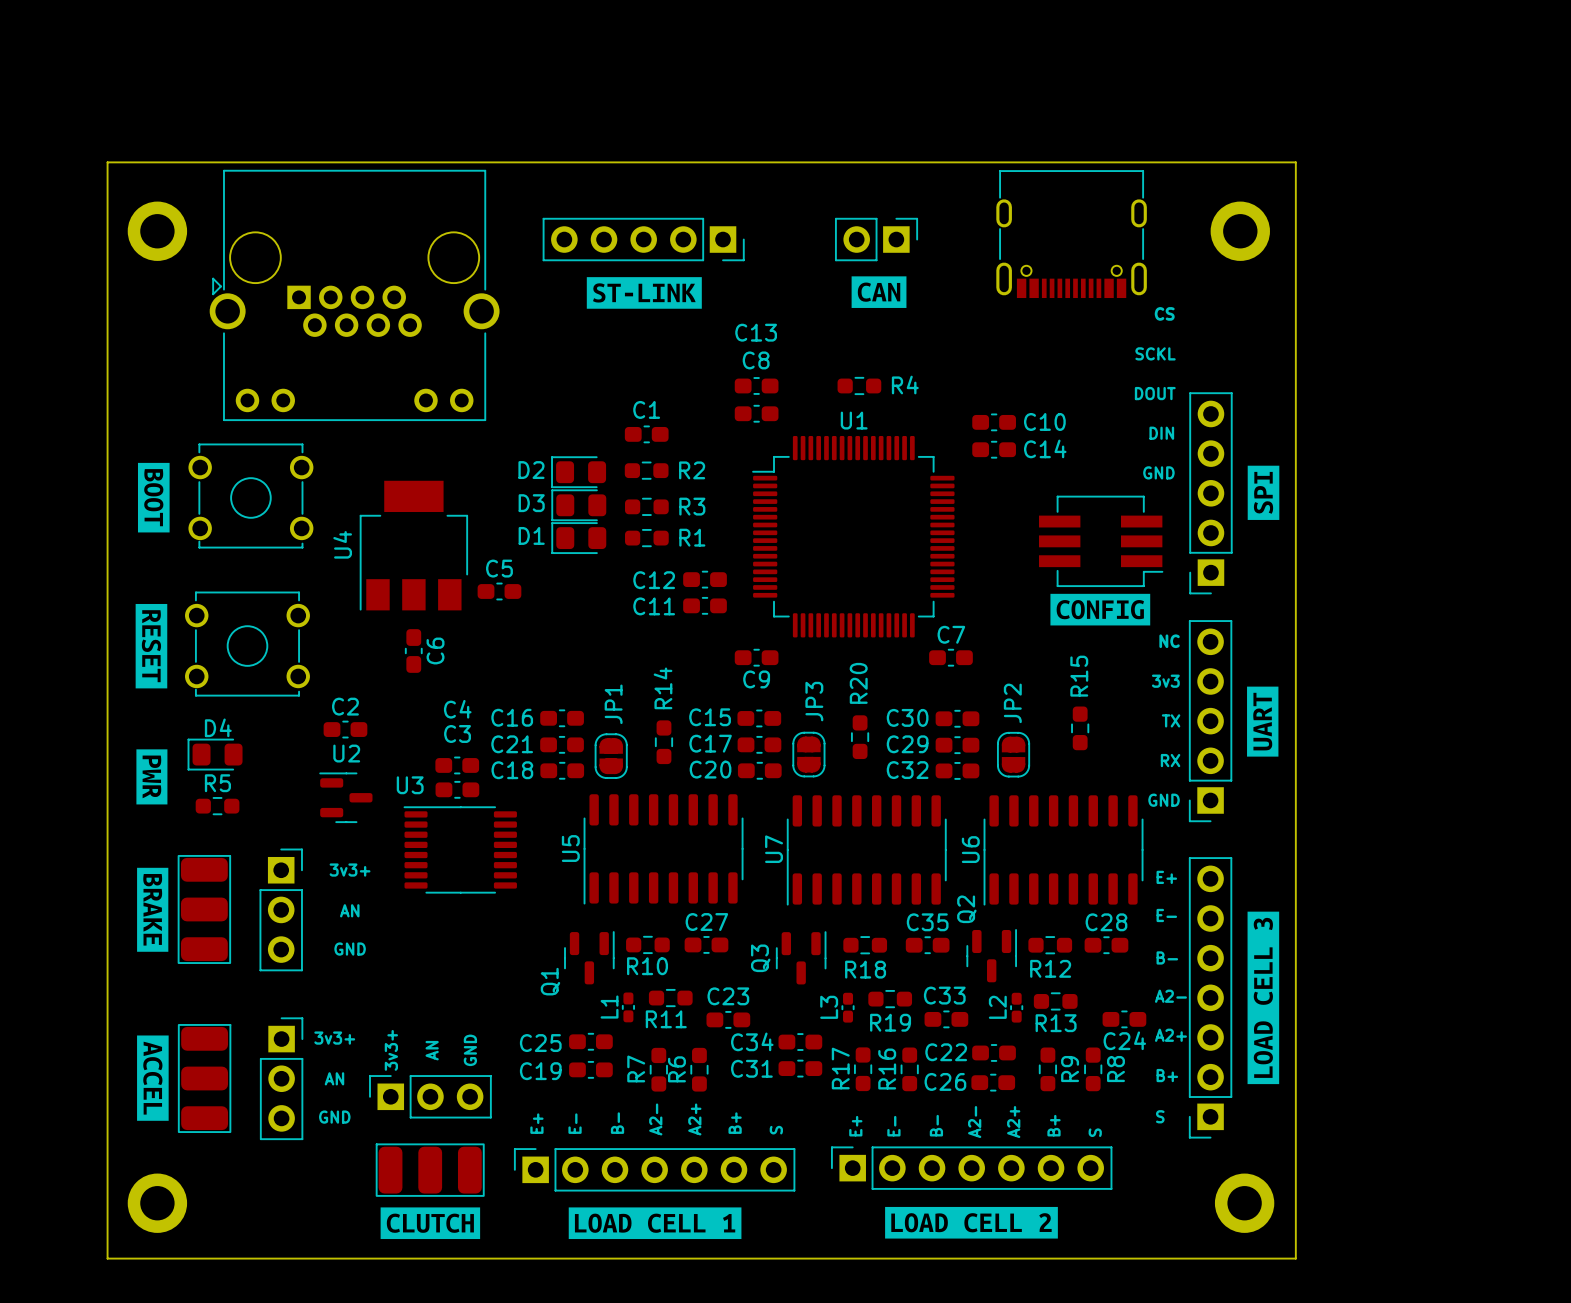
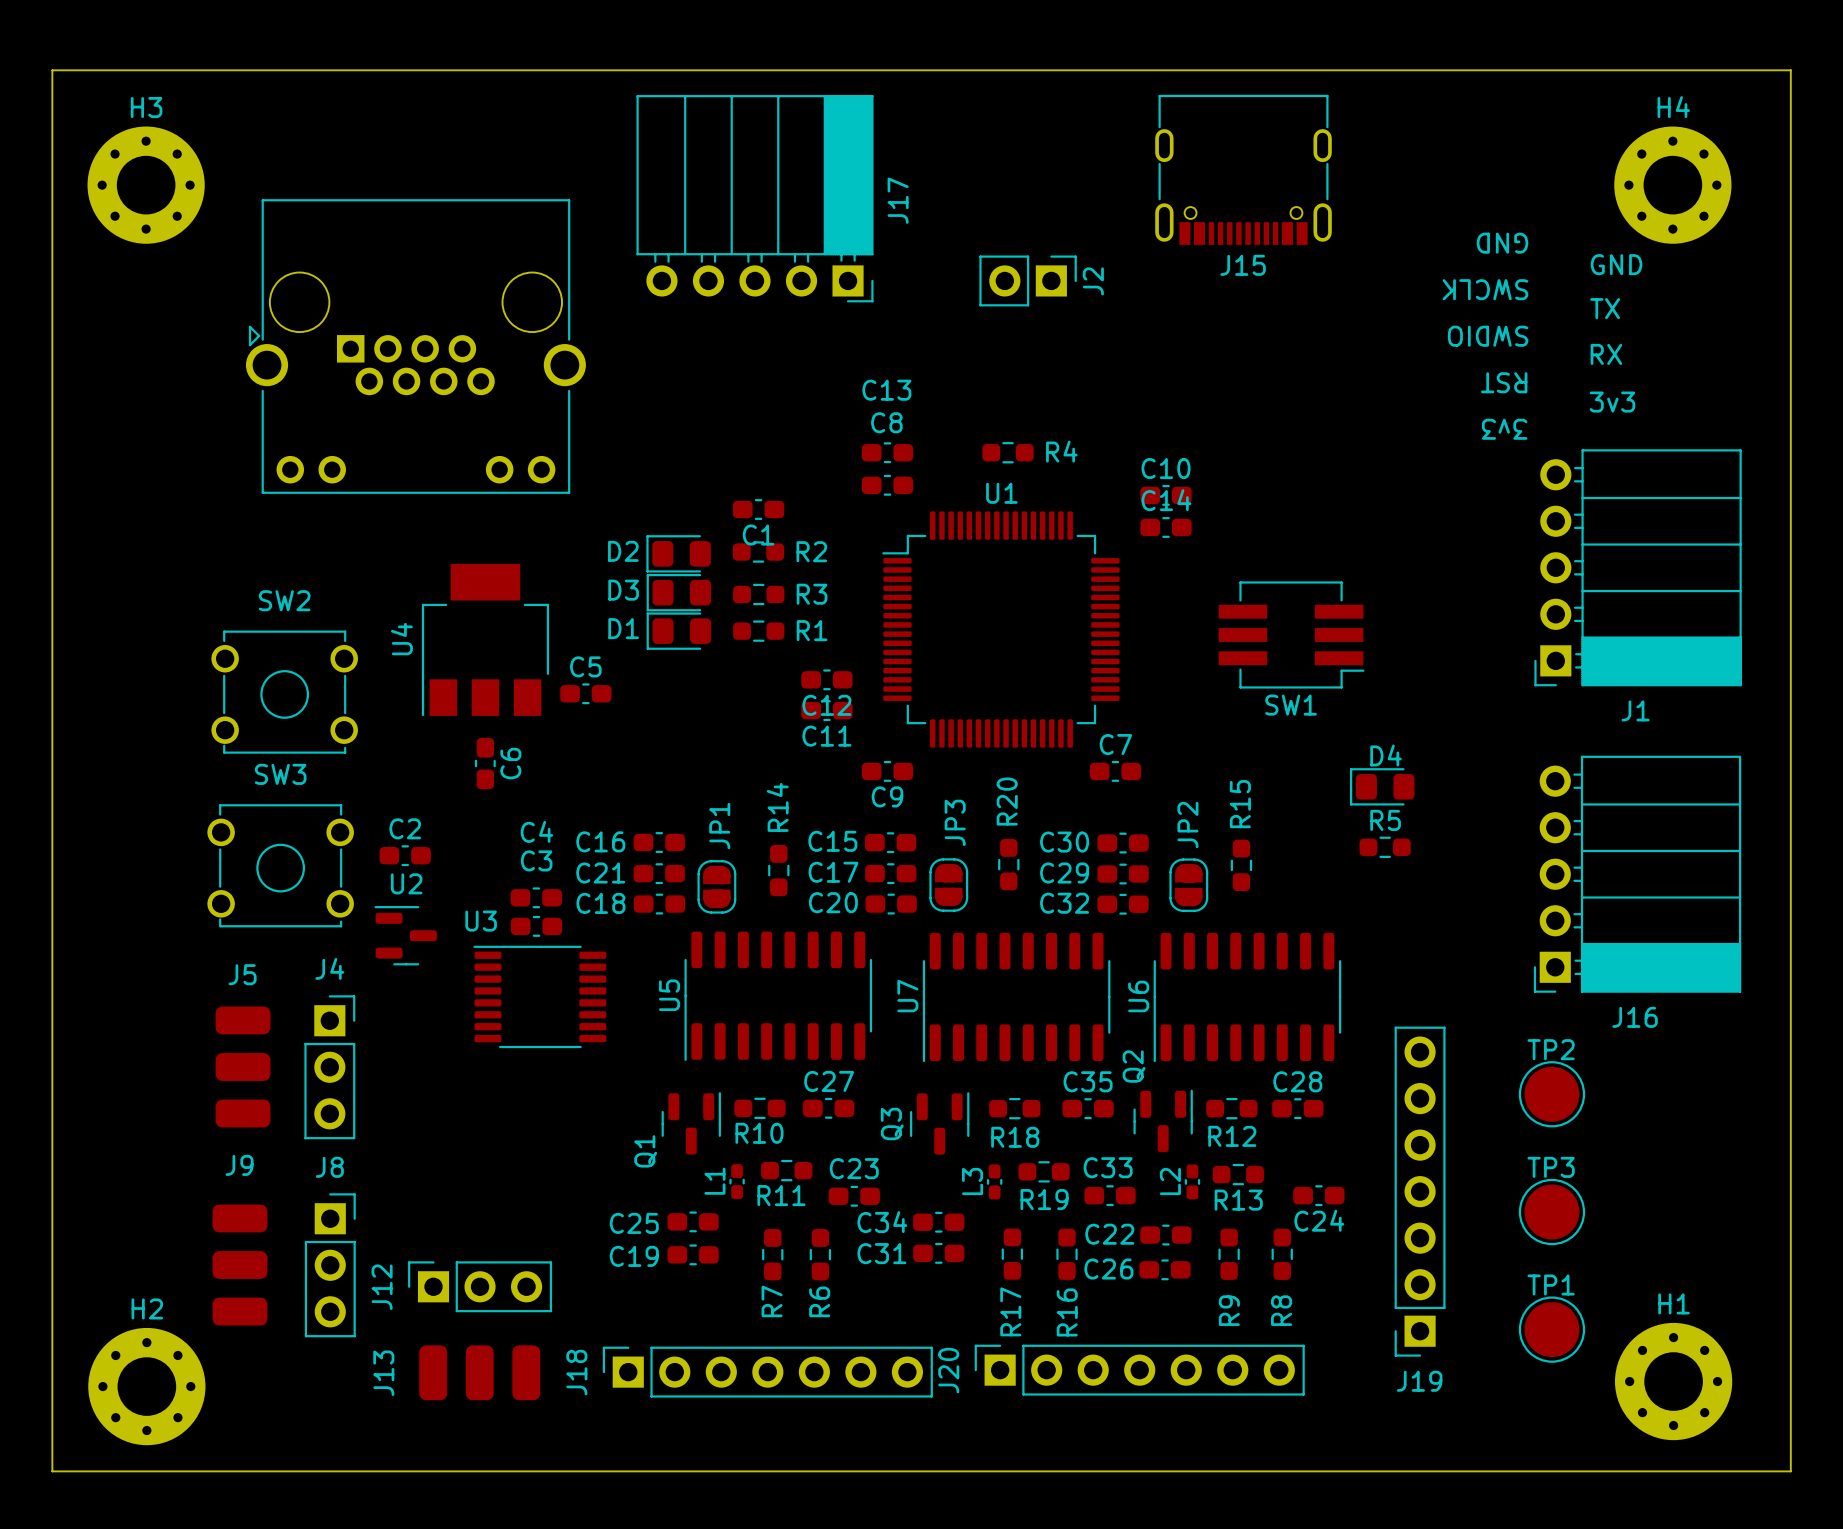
J15: none -> (1243, 169)
H3: none -> (146, 185)
H4: none -> (1672, 185)
board edge: (107, 162) (1295, 162) (1295, 1258) (107, 1258) (107, 162) -> (52, 70) (52, 1471) (1790, 1471) (1790, 70) (52, 70)
J17: none -> (754, 198)
text: none -> GND (1502, 243)
text: none -> GND (1616, 264)
part: (157, 231) -> none
part: (1240, 231) -> none
part: (1071, 234) -> none
part: (643, 239) -> none
J2 name: none -> J2 (1093, 281)
text: none -> SWCLK (1485, 289)
text: none -> TX (1605, 308)
drawing: [851, 276, 907, 308] -> none
drawing: [586, 277, 702, 309] -> none
text: none -> SWDIO (1488, 336)
text: none -> RX (1606, 354)
text: CS (1164, 313) -> none
text: none -> RST (1504, 382)
text: none -> 3v3 (1612, 402)
text: SCKL (1155, 353) -> none
text: none -> 3v3 (1504, 429)
text: DOUT (1155, 393) -> none
C1 name position: C1 (646, 409) -> C1 (758, 535)
C10 name position: C10 (1044, 421) -> C10 (1166, 468)
text: DIN (1161, 433) -> none
C14 name position: C14 (1045, 448) -> C14 (1166, 500)
drawing: [137, 462, 170, 533] -> none
drawing: [1247, 465, 1280, 520] -> none
text: GND (1158, 472) -> none
J1: none -> (1638, 567)
part: (1210, 493) -> none
part: (250, 496) -> none
C12 name position: C12 (654, 580) -> C12 (826, 705)
SW2: none -> (284, 692)
drawing: [1050, 593, 1151, 626] -> none
SW1 name: none -> SW1 (1291, 705)
drawing: [135, 603, 168, 689] -> none
C11 name position: C11 (654, 606) -> C11 (826, 736)
text: NC (1169, 641) -> none
part: (247, 644) -> none
text: 3v3 (1165, 681) -> none
drawing: [1247, 686, 1279, 757] -> none
text: TX (1171, 720) -> none
part: (1210, 721) -> none
R15 position: (1080, 728) -> (1241, 865)
SW3: none -> (280, 865)
J16: none -> (1637, 874)
drawing: [136, 749, 168, 805] -> none
D4 position: (215, 754) -> (1382, 786)
text: RX (1170, 760) -> none
text: GND (1164, 800) -> none
R5 position: (217, 806) -> (1385, 847)
J4 name: none -> J4 (329, 968)
drawing: [137, 867, 169, 952] -> none
text: 3v3+ (350, 870) -> none
text: E+ (1166, 877) -> none
part: (204, 909) -> none
J5: none -> (243, 1066)
text: AN (349, 910) -> none
drawing: [1247, 911, 1280, 1085] -> none
text: E- (1166, 915) -> none
TP2: none -> (1551, 1094)
text: GND (350, 949) -> none
text: B- (1167, 957) -> none
J8 name: none -> J8 (329, 1167)
text: A2- (1170, 996) -> none
part: (1210, 997) -> none
J19: none -> (1420, 1191)
TP3: none -> (1551, 1212)
drawing: [137, 1035, 169, 1121] -> none
text: A2+ (1170, 1035) -> none
text: 3v3+ (334, 1038) -> none
text: 3v3+ (391, 1050) -> none
text: AN (432, 1050) -> none
text: GND (470, 1050) -> none
R7 name position: R7 (636, 1068) -> R7 (772, 1301)
R17 name position: R17 (840, 1068) -> R17 (1010, 1311)
R6 name position: R6 (676, 1069) -> R6 (819, 1301)
R16 name position: R16 (887, 1069) -> R16 (1067, 1312)
R9 name position: R9 (1070, 1069) -> R9 (1229, 1310)
R8 name position: R8 (1115, 1069) -> R8 (1281, 1310)
text: B+ (1167, 1075) -> none
part: (204, 1078) -> none
J9: none -> (239, 1265)
text: AN (334, 1078) -> none
part: (430, 1096) -> none
J12: none -> (480, 1286)
text: S (1160, 1116) -> none
text: GND (334, 1117) -> none
text: A2- (655, 1119) -> none
text: A2+ (694, 1119) -> none
text: A2- (974, 1122) -> none
text: A2+ (1013, 1122) -> none
text: E+ (536, 1123) -> none
text: E- (575, 1123) -> none
text: B- (617, 1123) -> none
text: B+ (735, 1123) -> none
text: B- (936, 1125) -> none
text: B+ (1054, 1125) -> none
text: E+ (855, 1126) -> none
text: E- (893, 1126) -> none
text: S (776, 1130) -> none
text: S (1095, 1132) -> none
TP1: none -> (1551, 1329)
J20 name: none -> J20 (948, 1370)
J13: none -> (479, 1372)
part: (430, 1170) -> none
J18 name: none -> J18 (576, 1372)
H1: none -> (1673, 1381)
H2: none -> (146, 1386)
part: (157, 1203) -> none
part: (1244, 1203) -> none
drawing: [885, 1206, 1058, 1239] -> none
drawing: [380, 1207, 481, 1240] -> none
drawing: [568, 1207, 742, 1240] -> none

